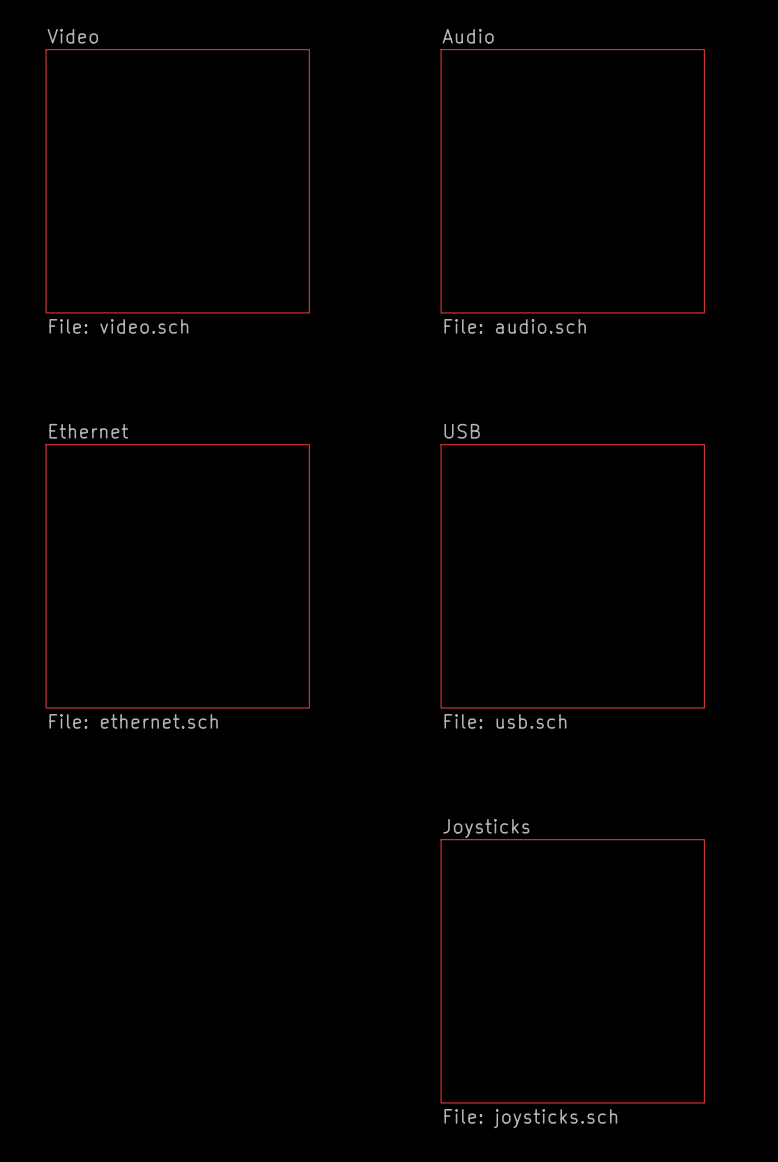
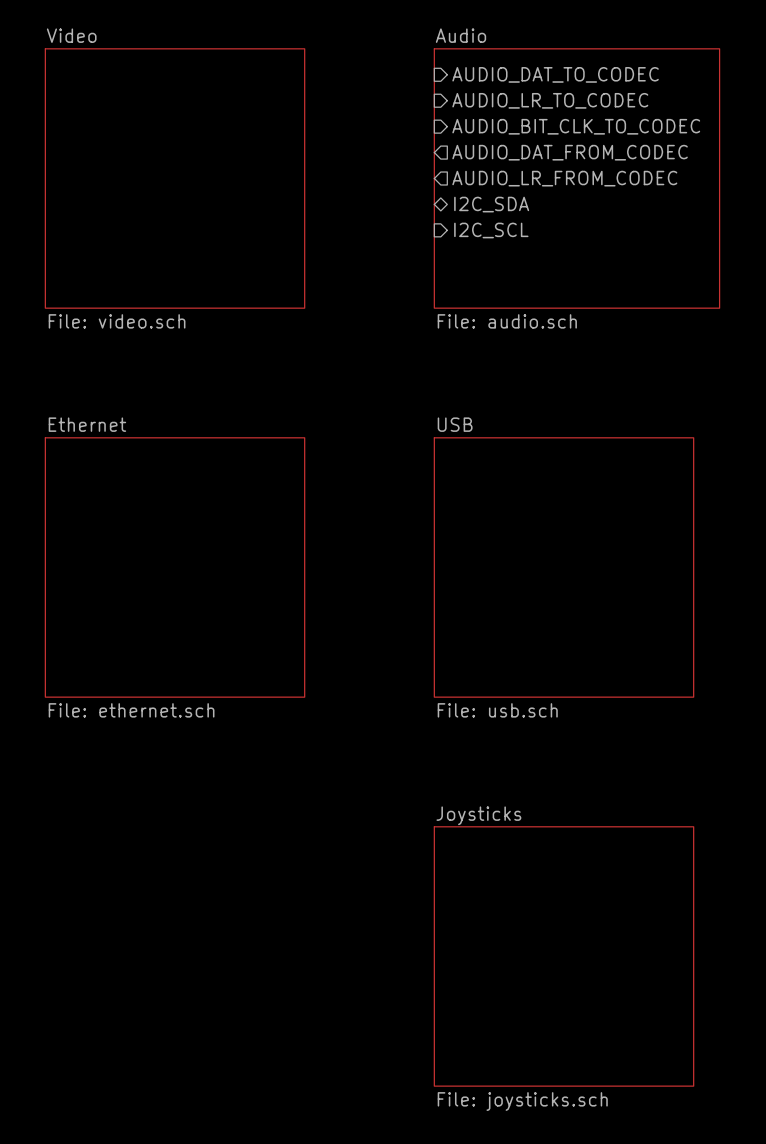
sheet pin: none -> AUDIO_DAT_TO_CODEC (555, 74)
sheet pin: none -> AUDIO_LR_TO_CODEC (550, 100)
sheet pin: none -> AUDIO_BIT_CLK_TO_CODEC (576, 126)
sheet pin: none -> AUDIO_DAT_FROM_CODEC (570, 152)
sheet Audio: File: audio.sch (572, 181) -> none
sheet pin: none -> AUDIO_LR_FROM_CODEC (564, 178)
sheet Audio: none -> File: audio.sch (576, 178)
sheet pin: none -> I2C_SDA (491, 204)
sheet pin: none -> I2C_SCL (491, 230)

